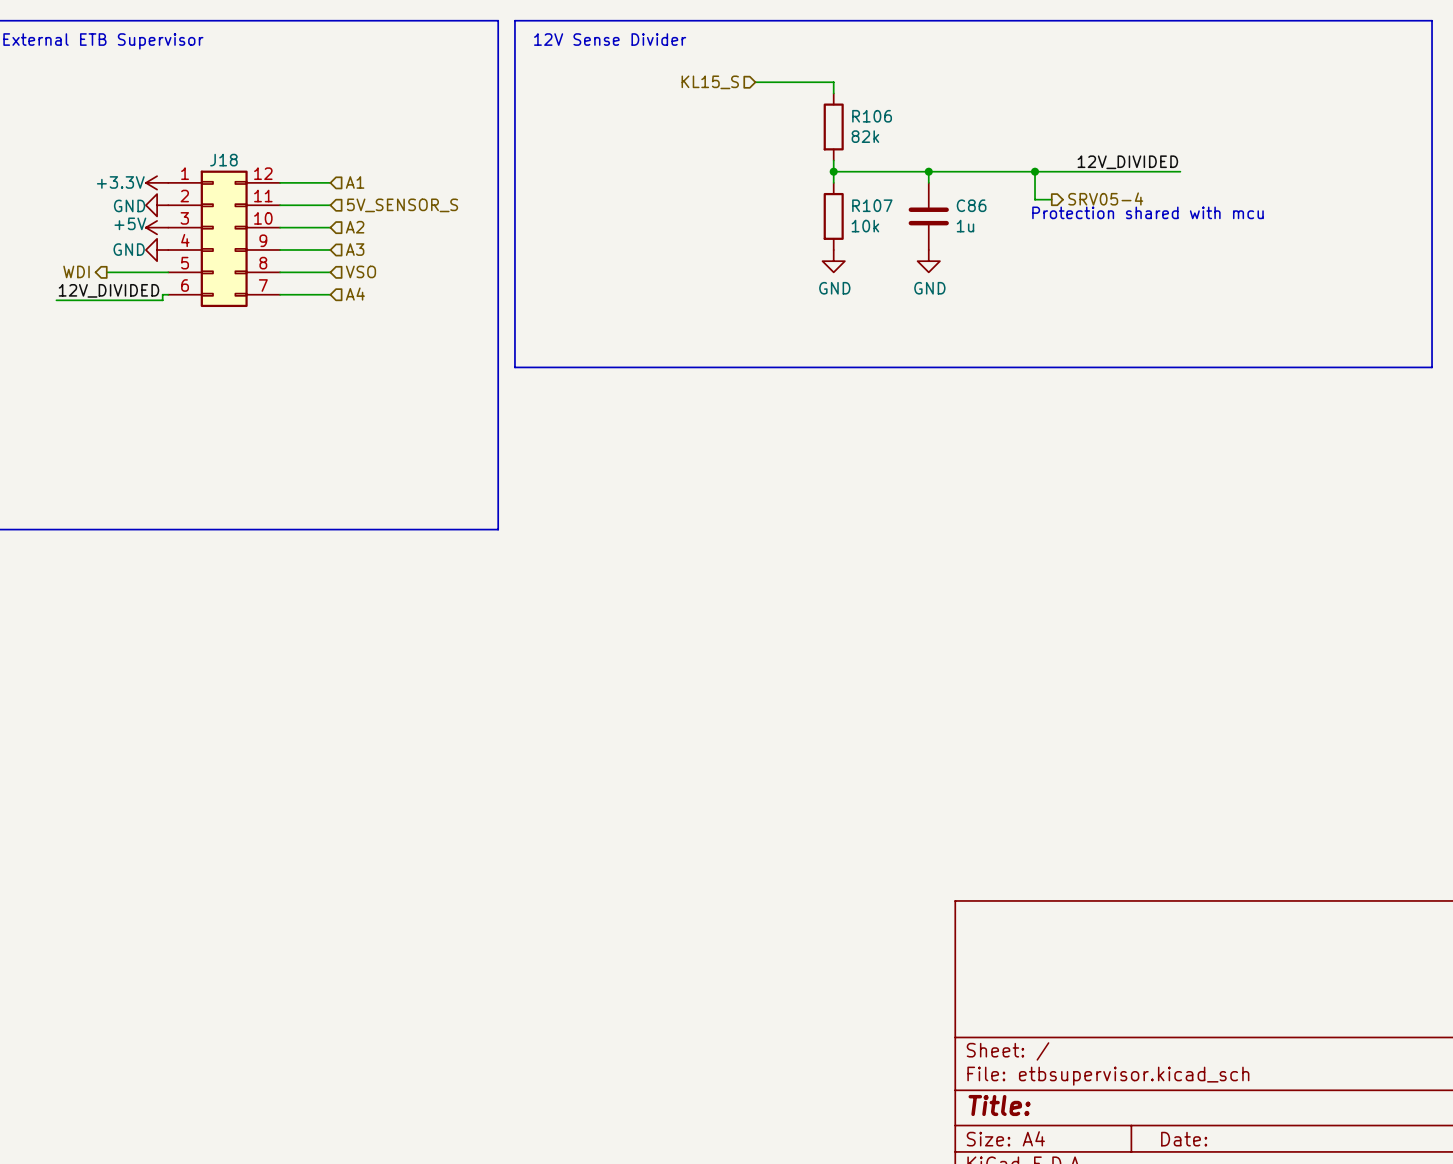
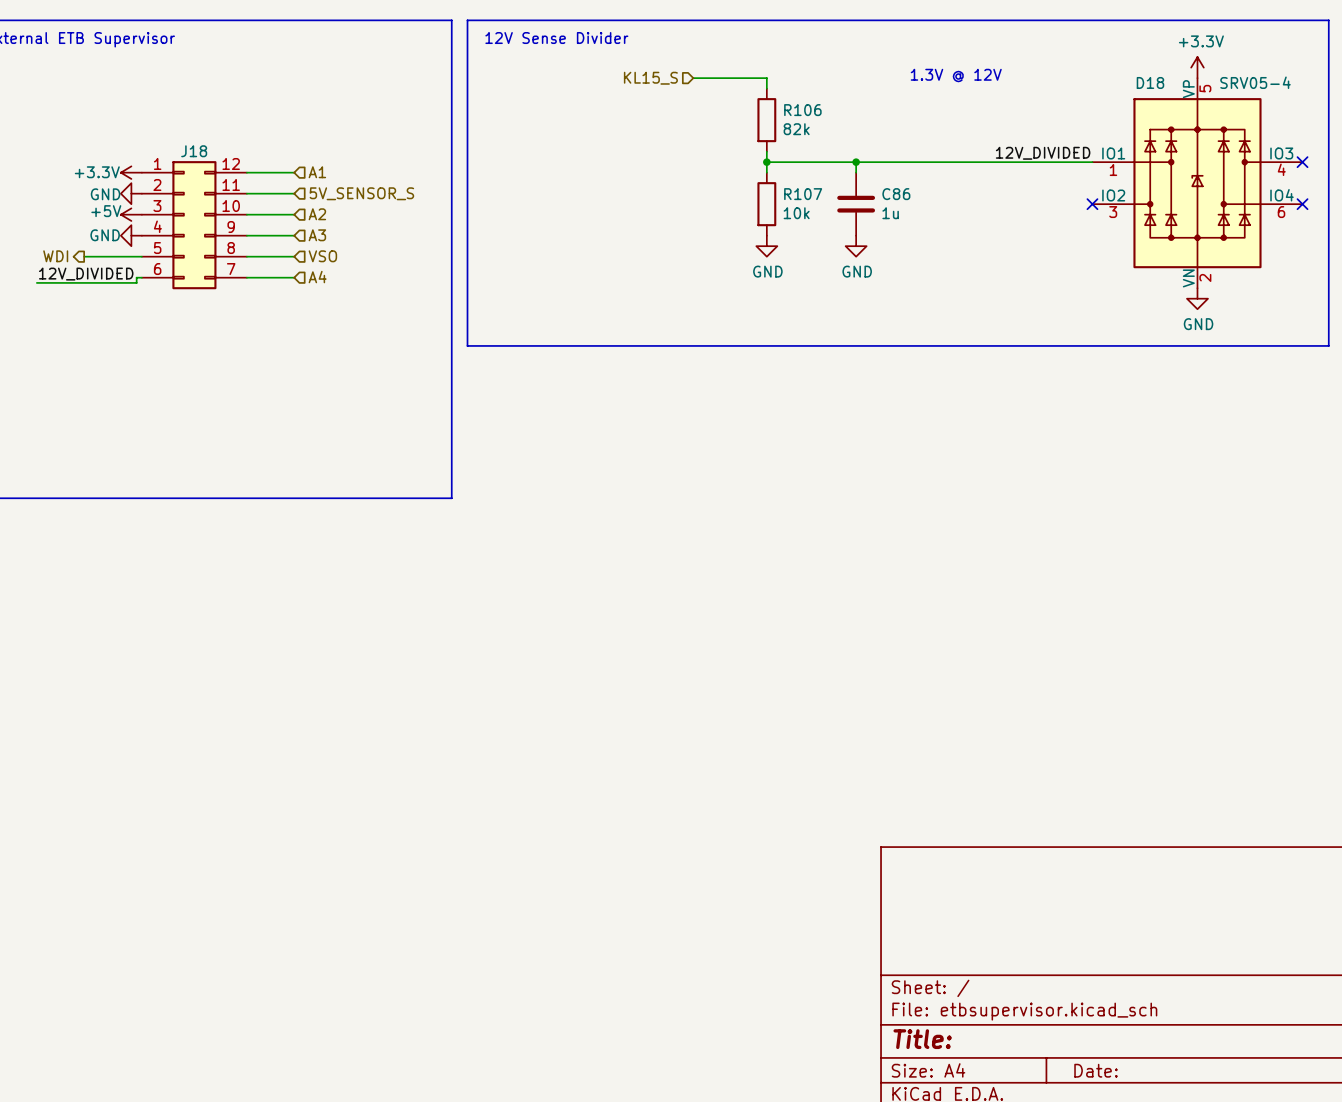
power symbol: none -> +3.3V (1197, 67)
text: none -> 1.3V @ 12V (956, 75)
wire: (1035, 171) (1035, 199) (1051, 199) -> none
junction: (1035, 171) -> none
no-connect mark: none -> (1302, 162)
D18: none -> SRV05-4 (1197, 183)
hierarchical label: SRV05-4 (1105, 198) -> none
text: Protection shared with mcu (1147, 212) -> none
no-connect mark: none -> (1092, 204)
no-connect mark: none -> (1302, 204)
power symbol: none -> GND (1197, 298)

